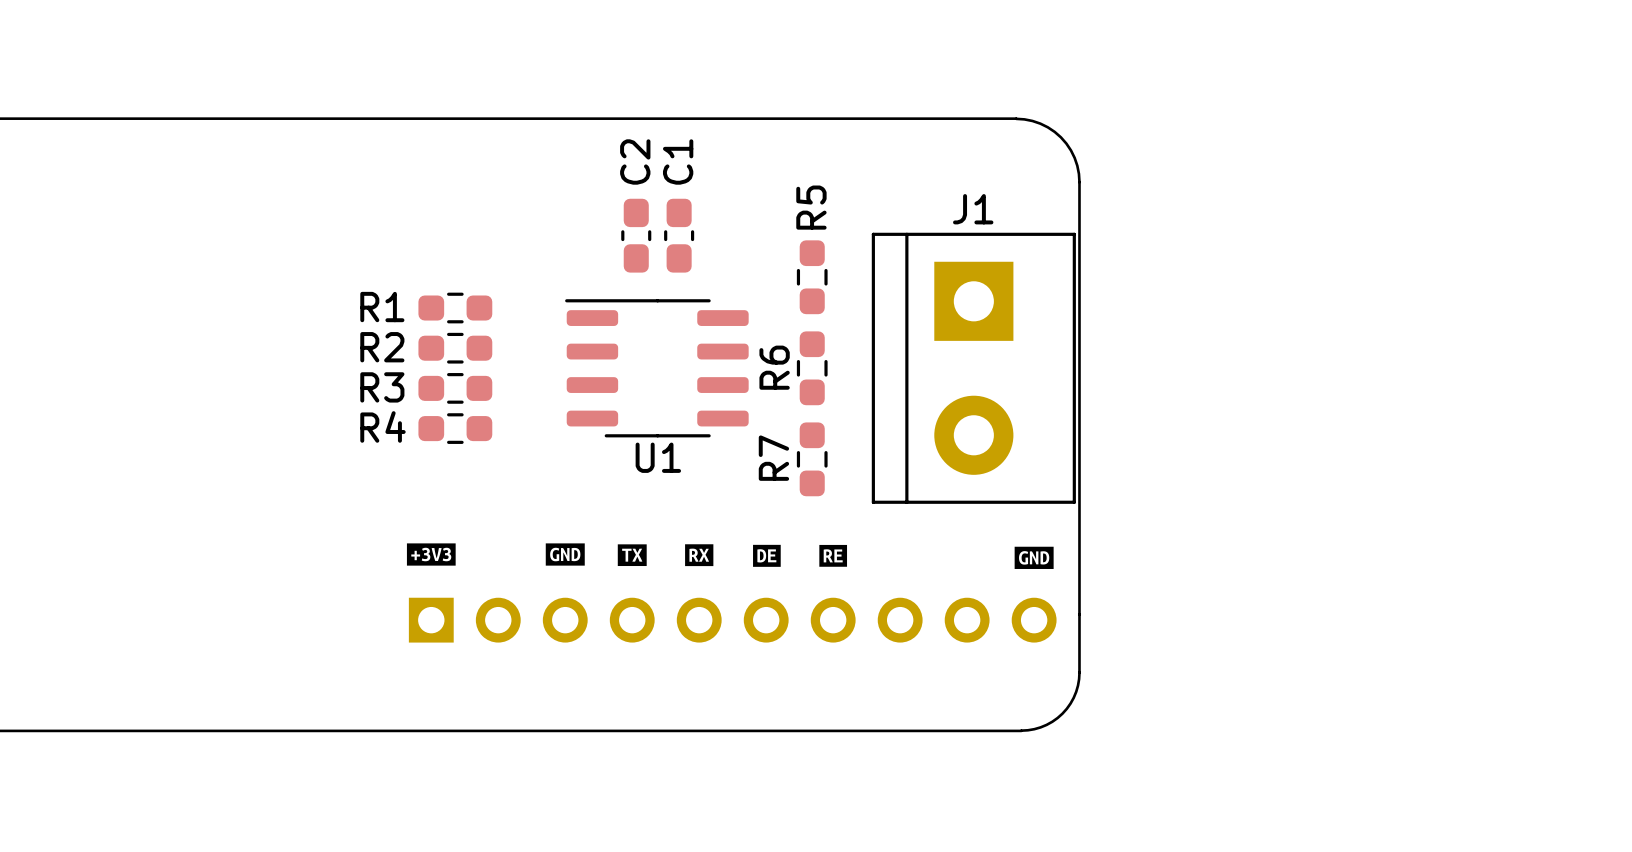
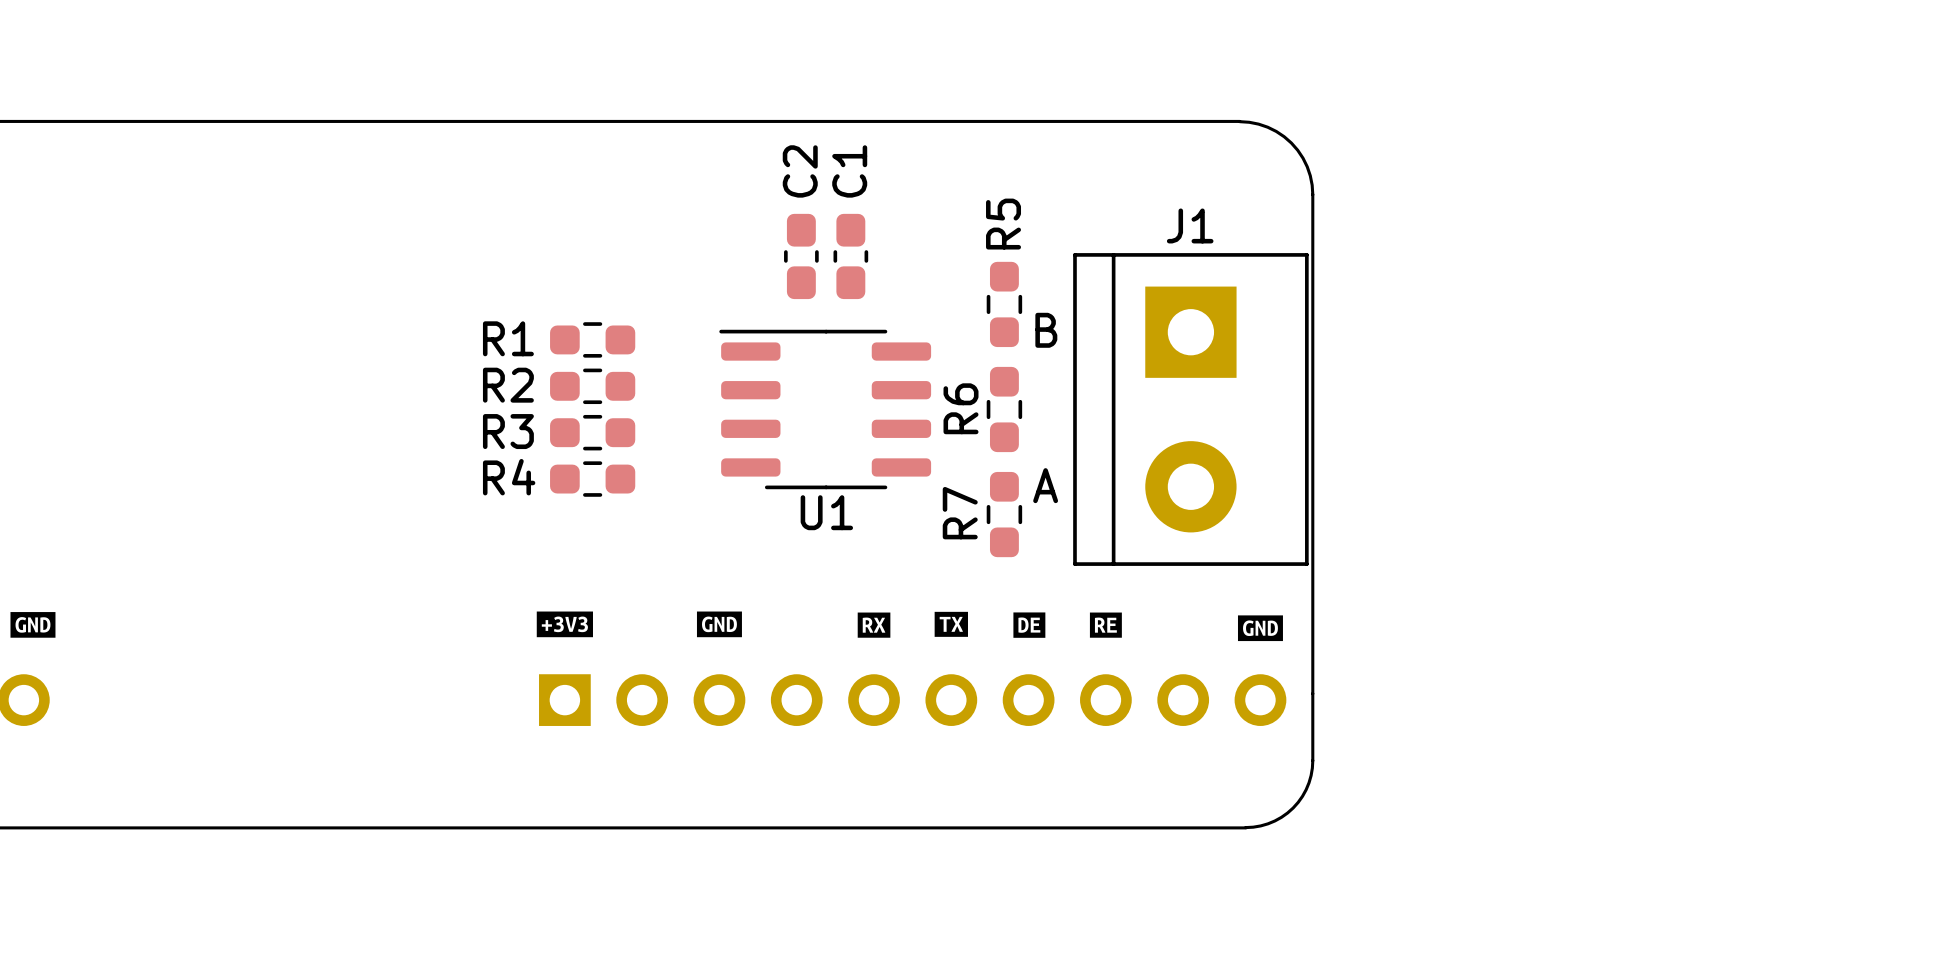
text: none -> B (1046, 330)
text: none -> A (1045, 485)
drawing position: (632, 555) -> (951, 624)
drawing position: (766, 555) -> (1029, 625)
drawing position: (833, 555) -> (1105, 625)

